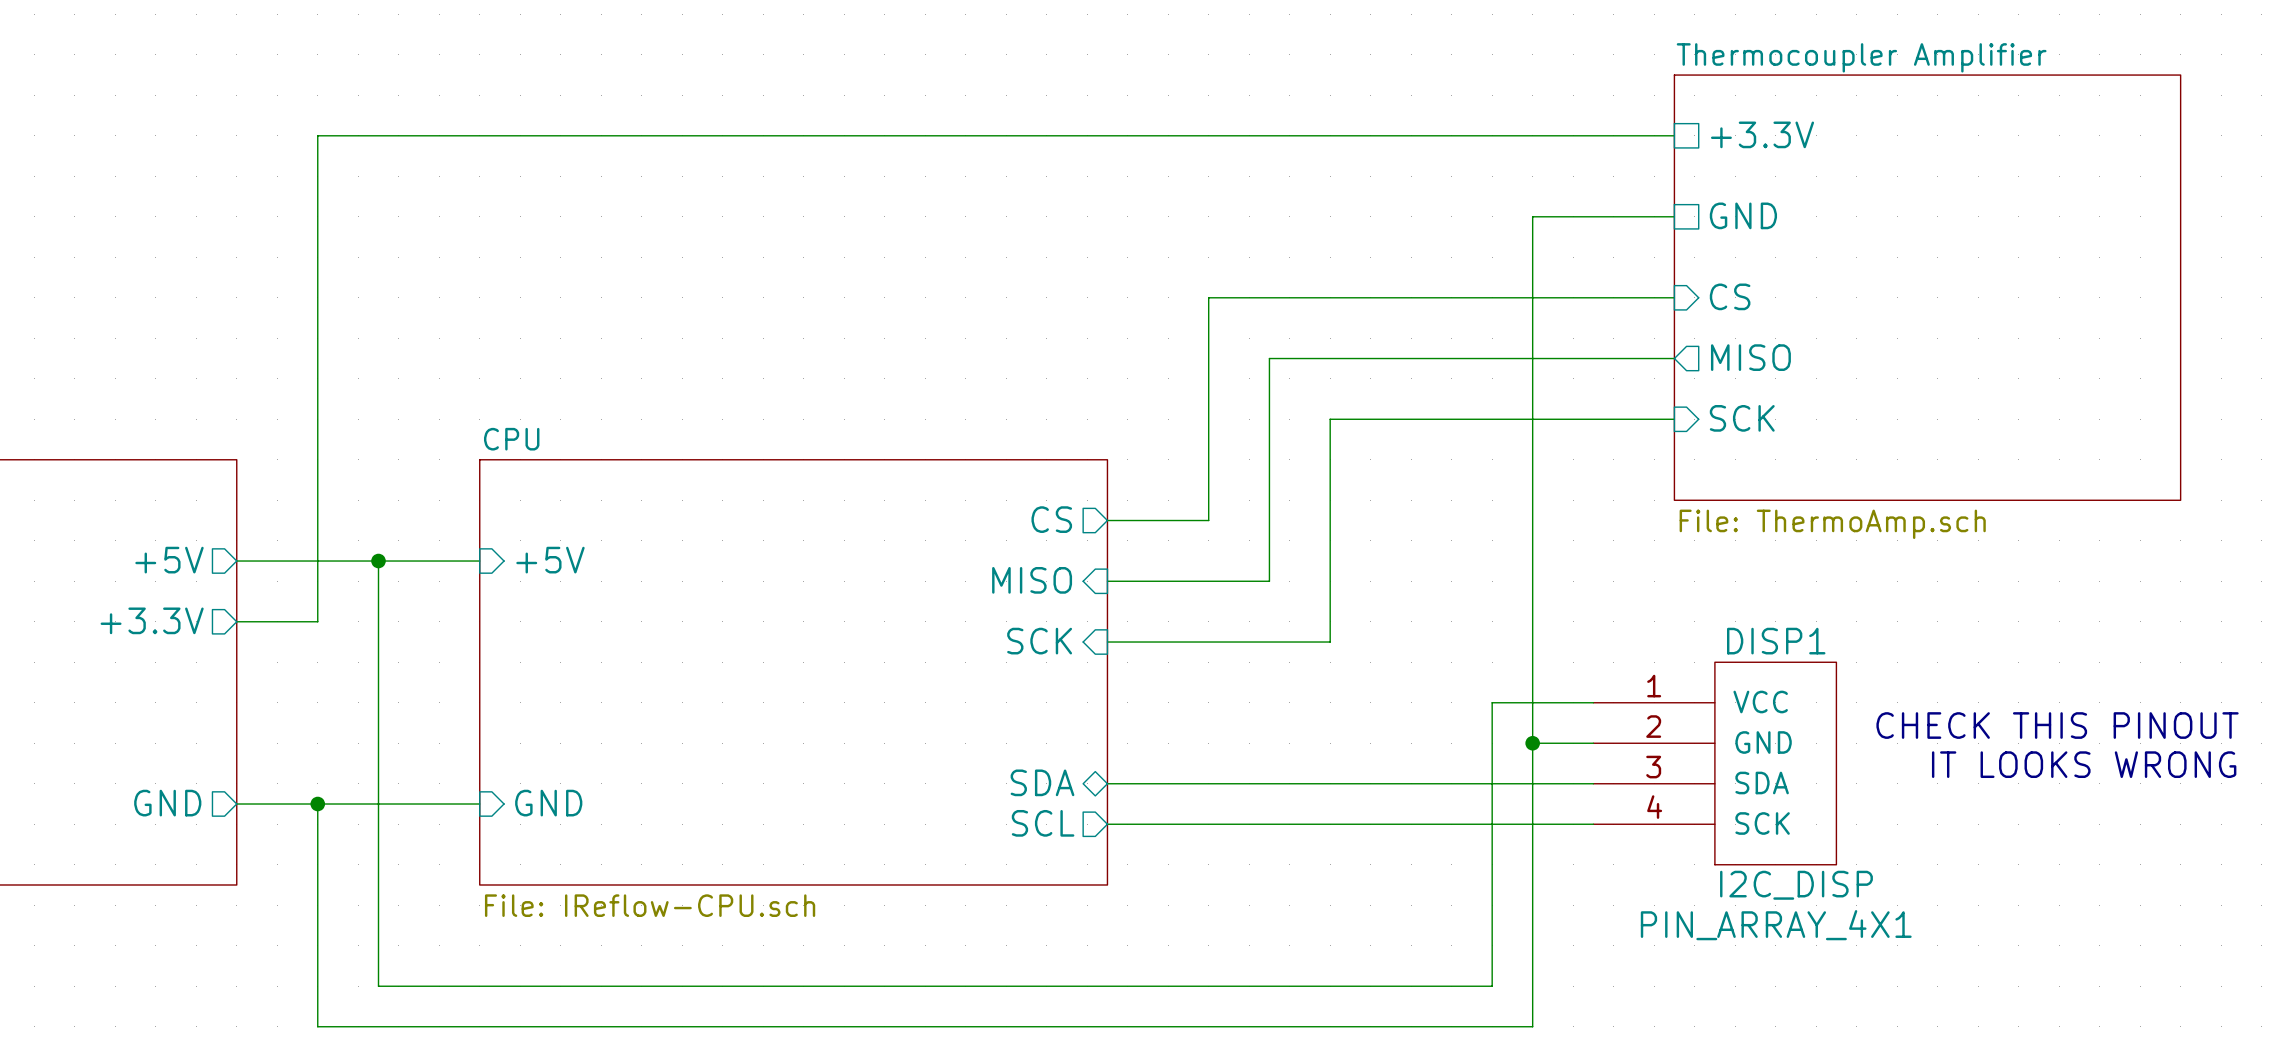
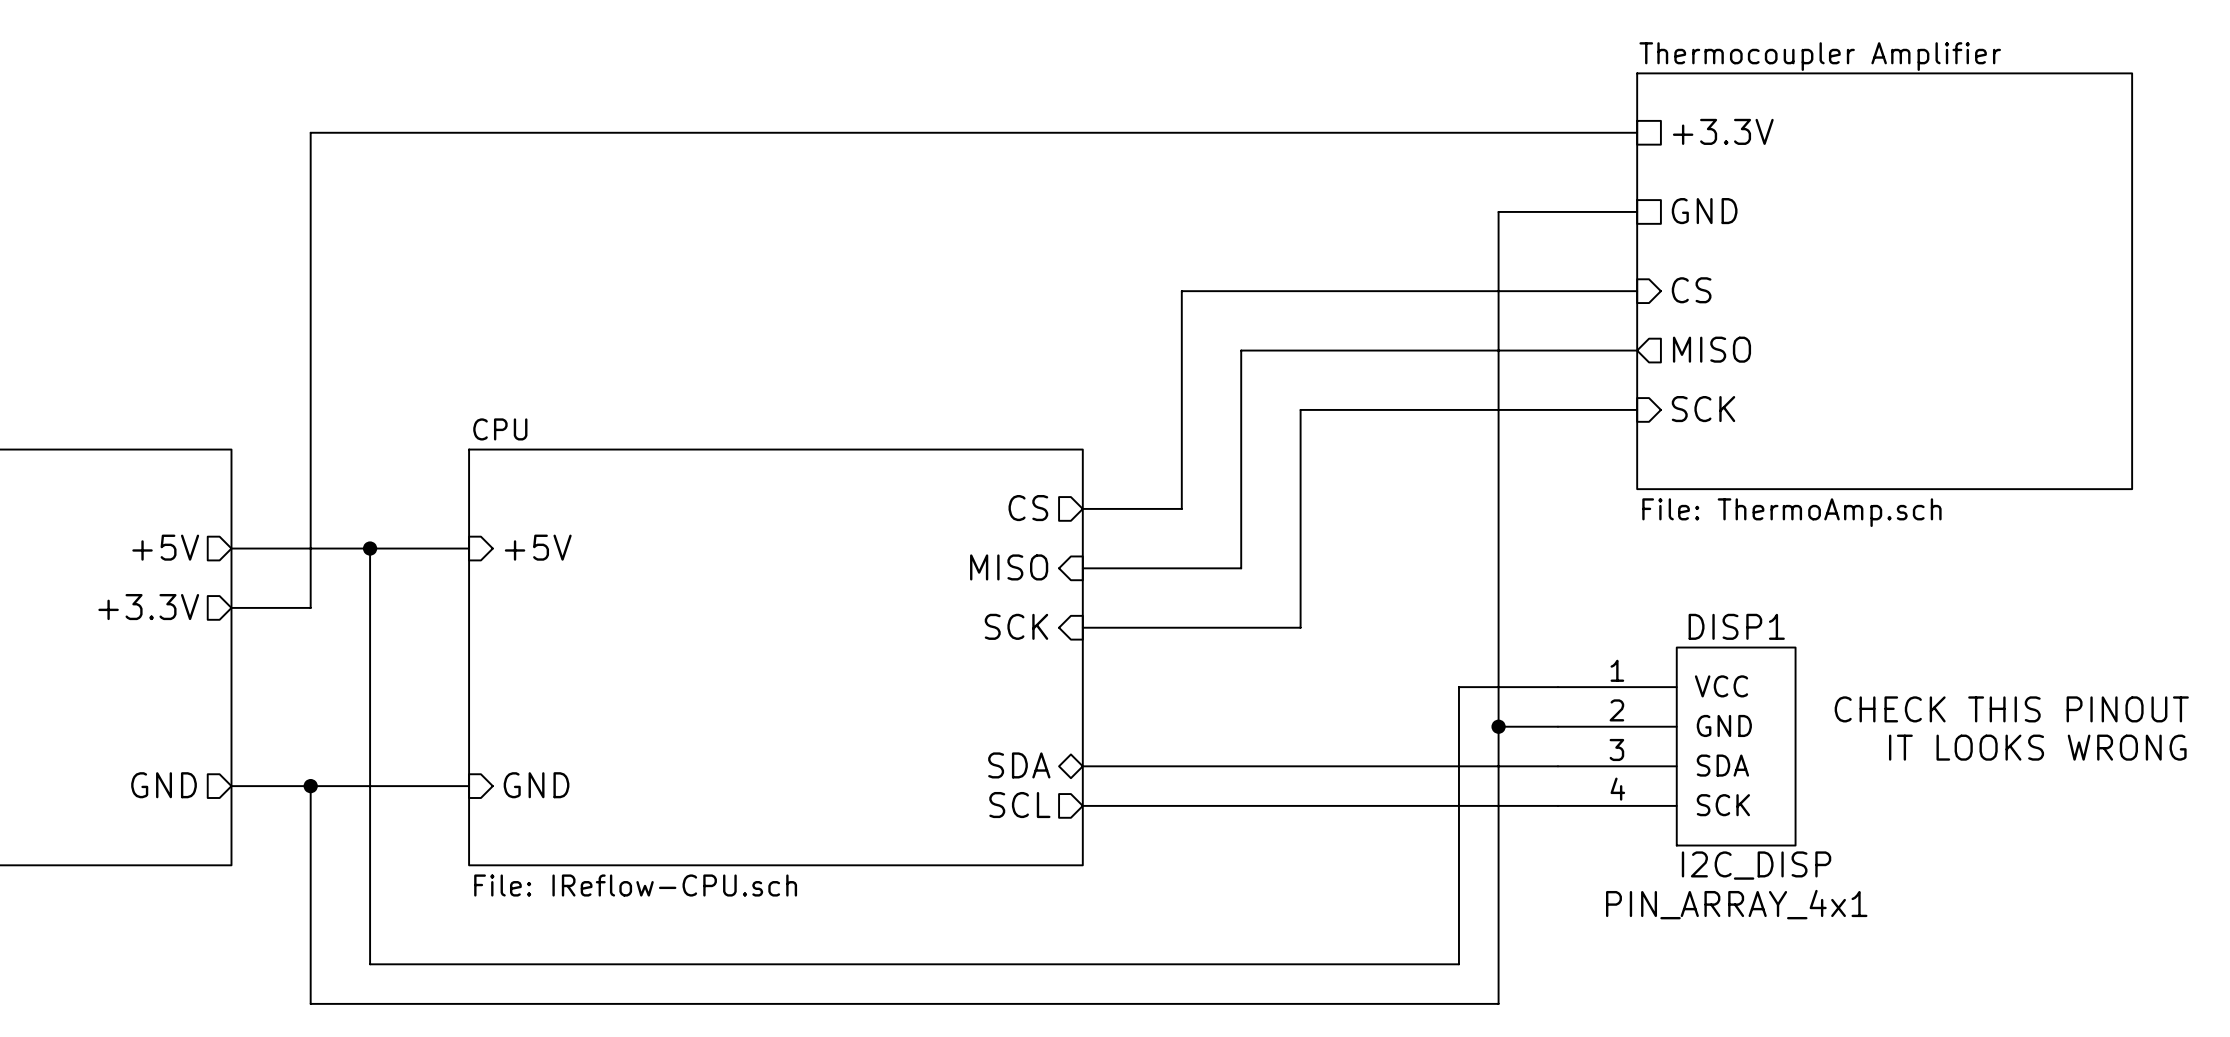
DISP1 text: PIN_ARRAY_4X1 (1776, 925) -> PIN_ARRAY_4x1 (1736, 904)

